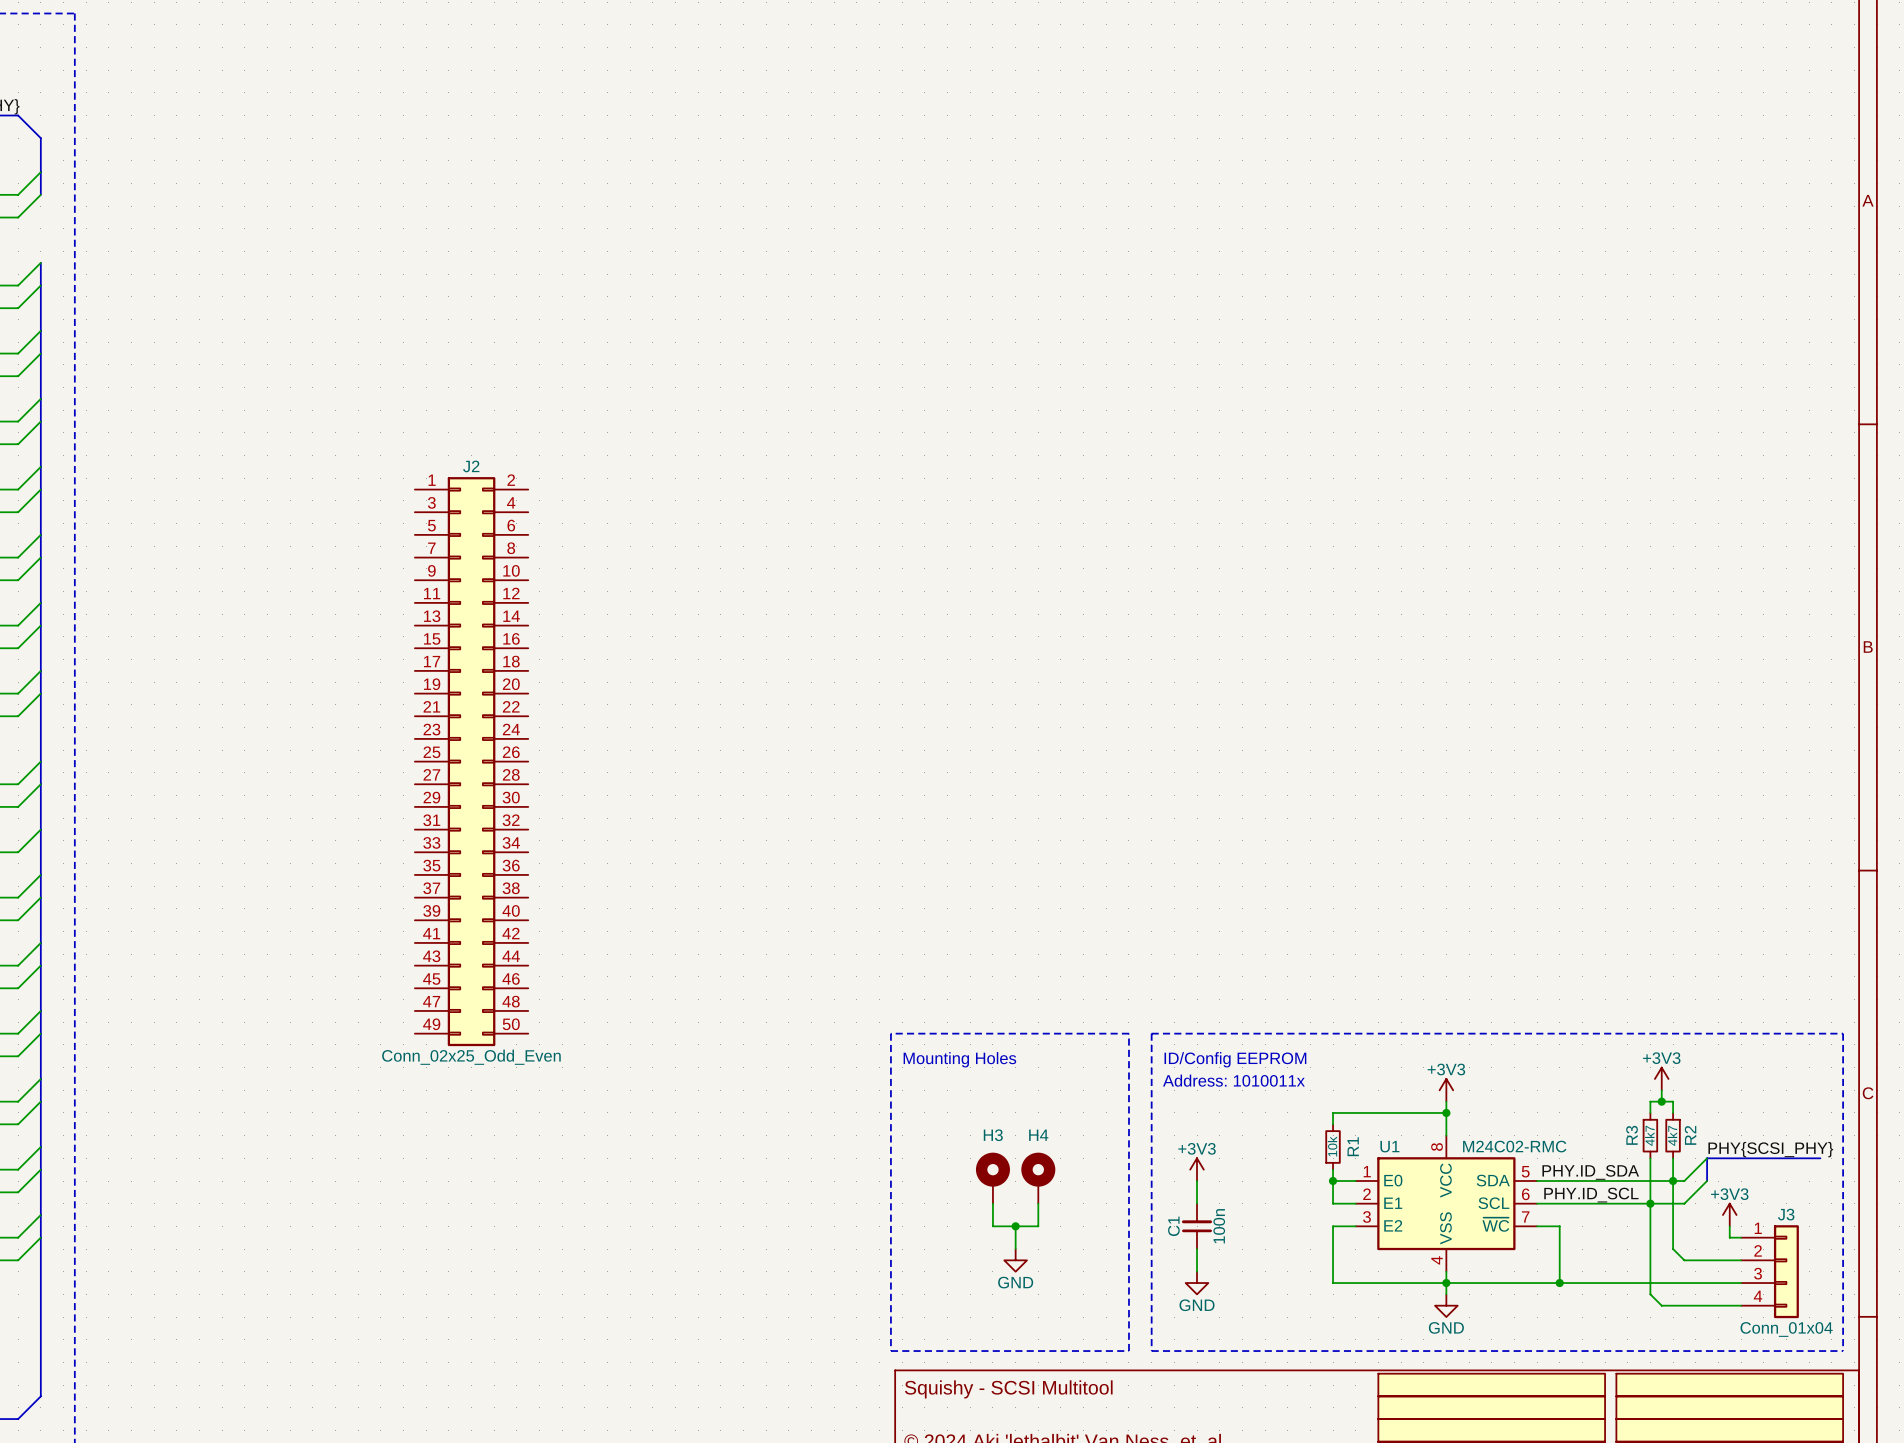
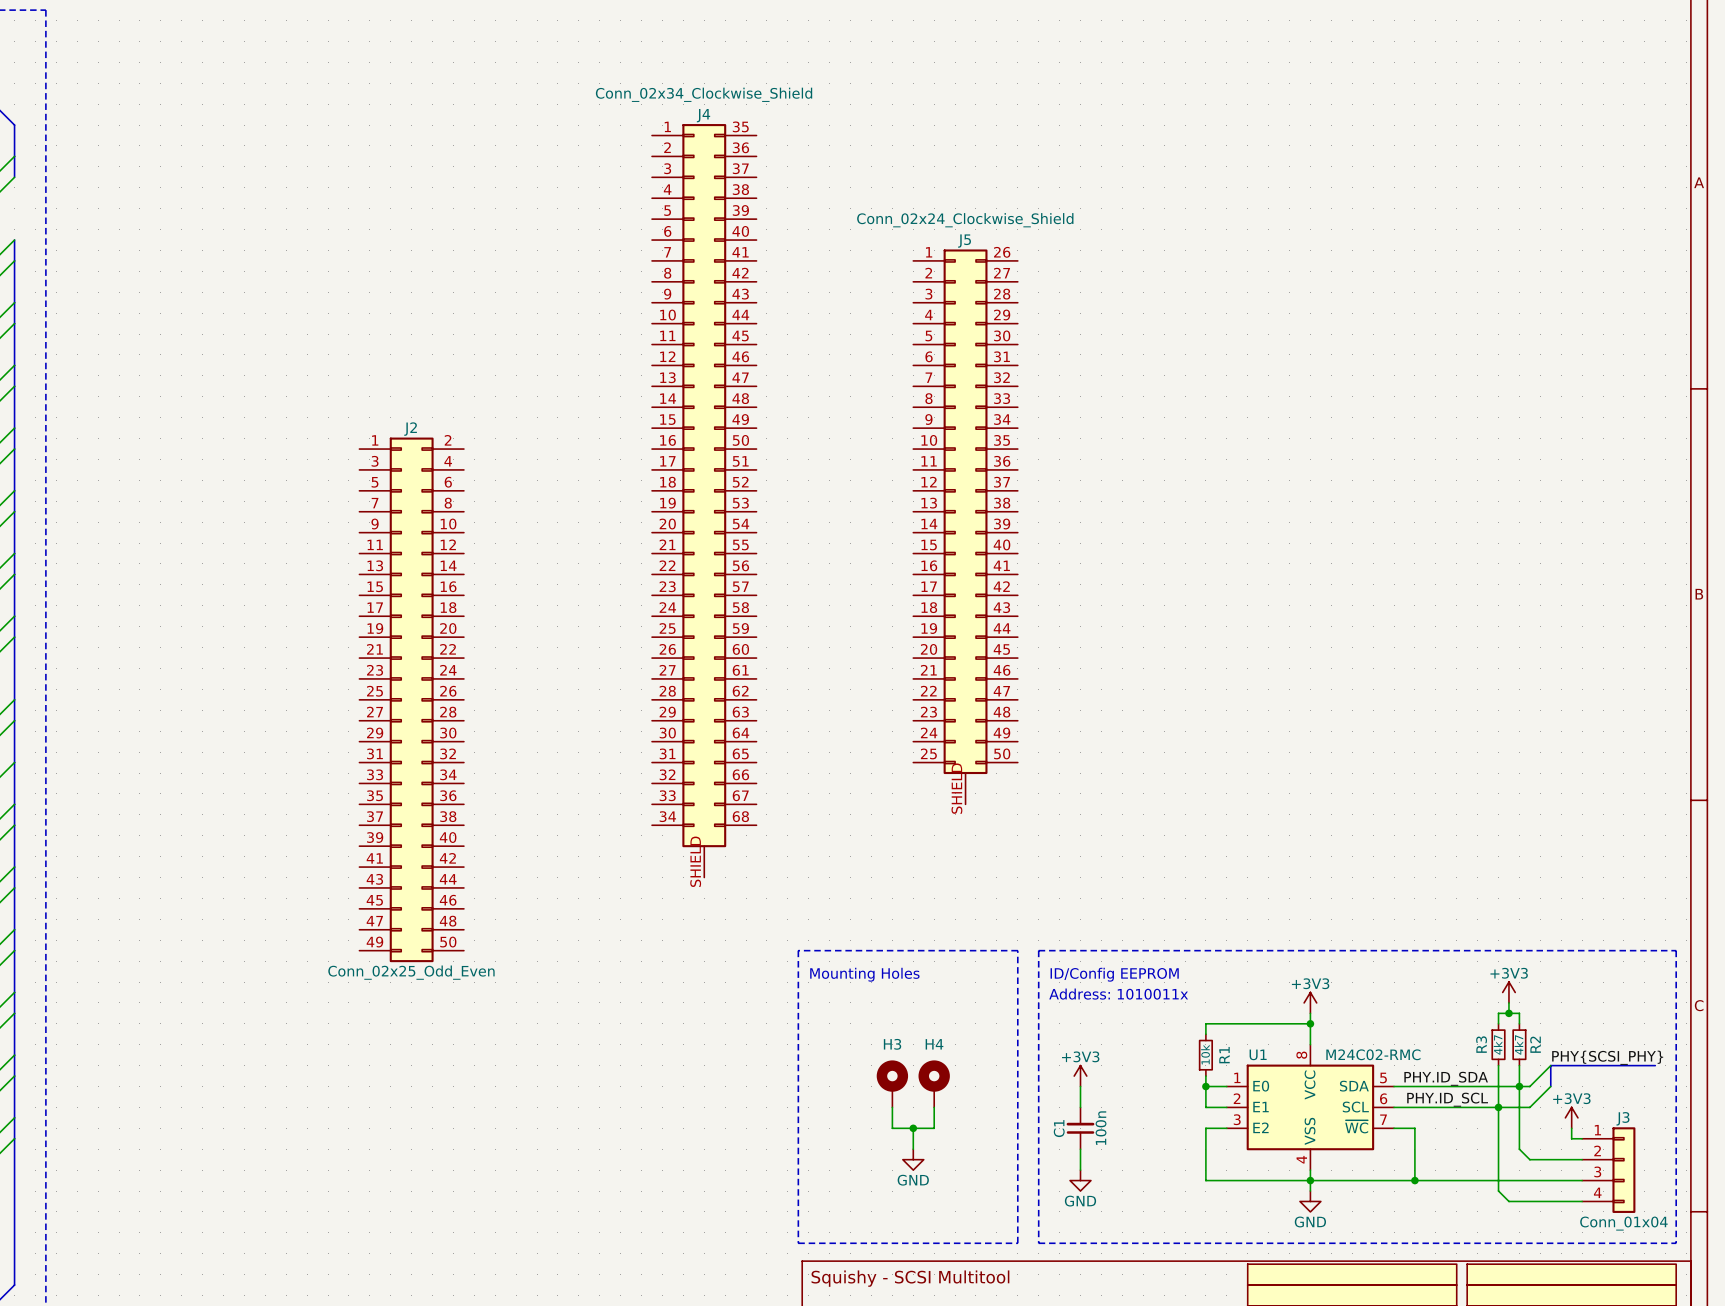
J4: none -> Conn_02x34_Clockwise_Shield (704, 500)
J5: none -> Conn_02x24_Clockwise_Shield (965, 526)

